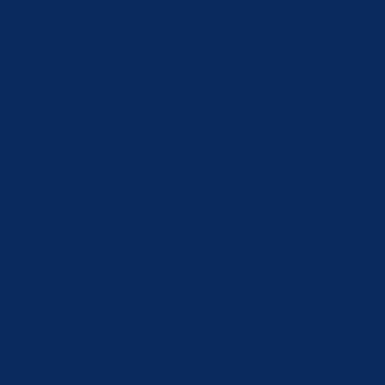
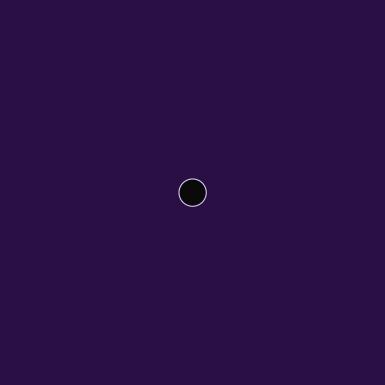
hole: none -> (192, 192)

